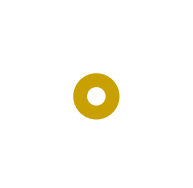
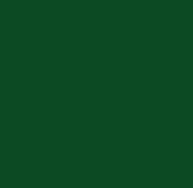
part: (96, 96) -> none

